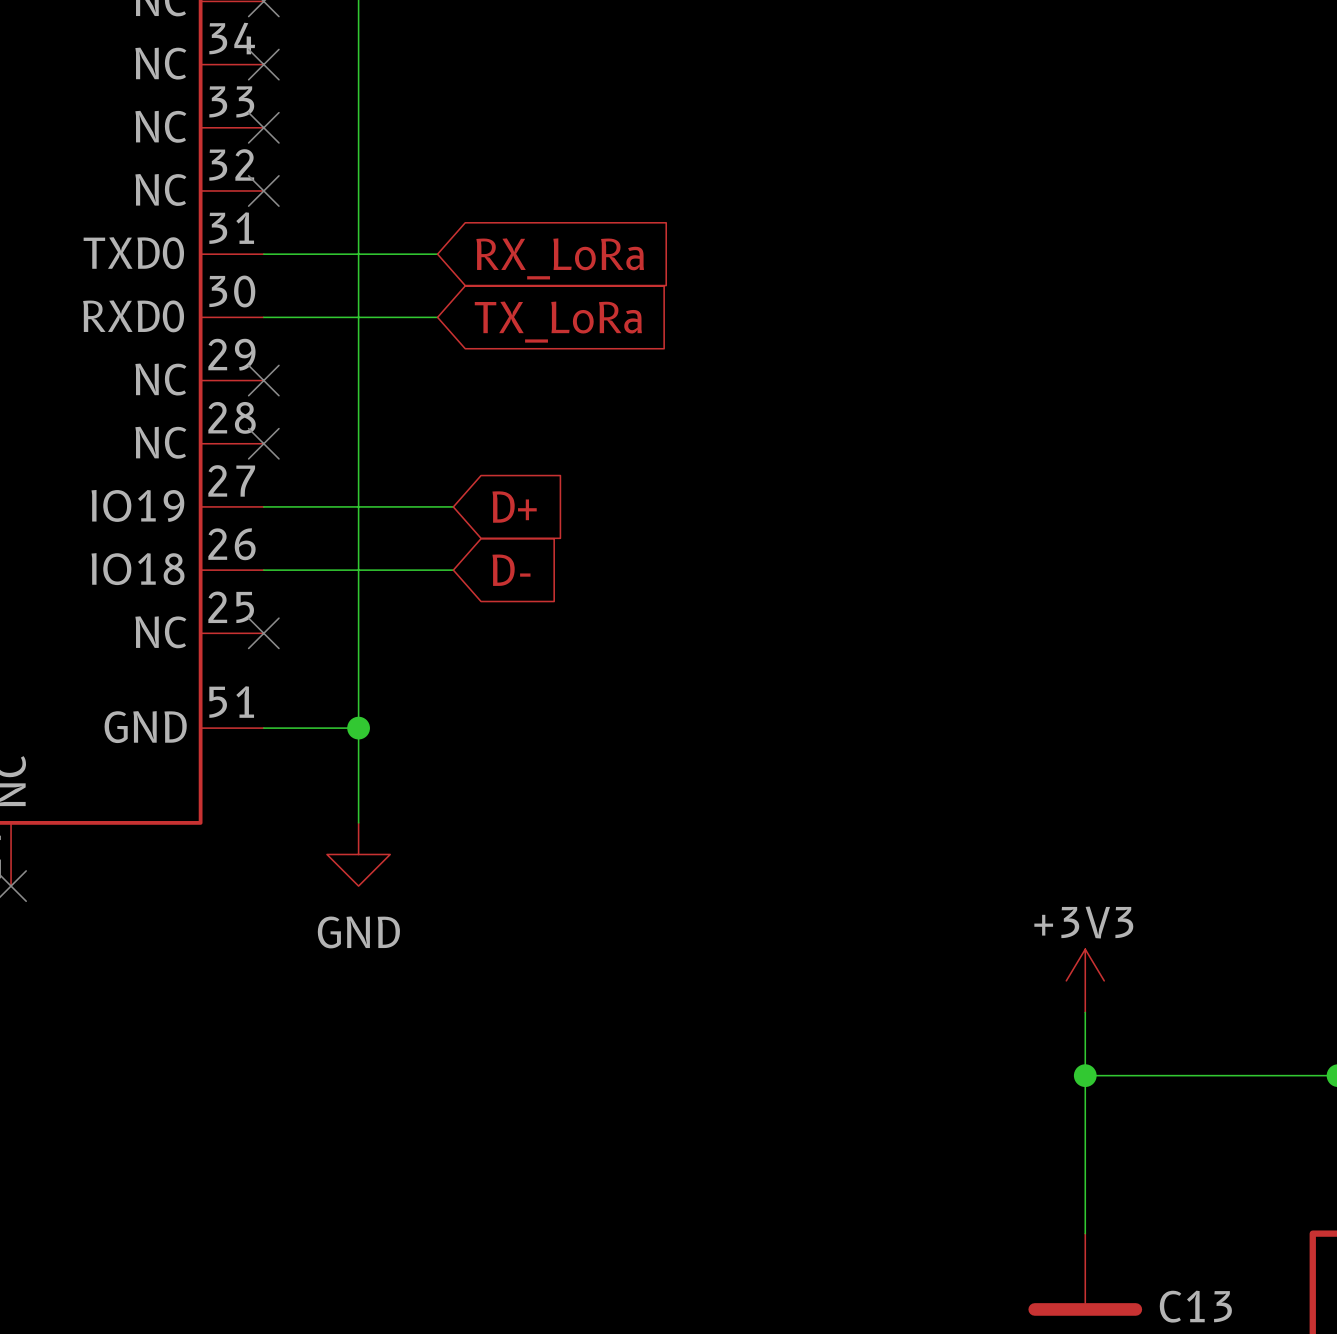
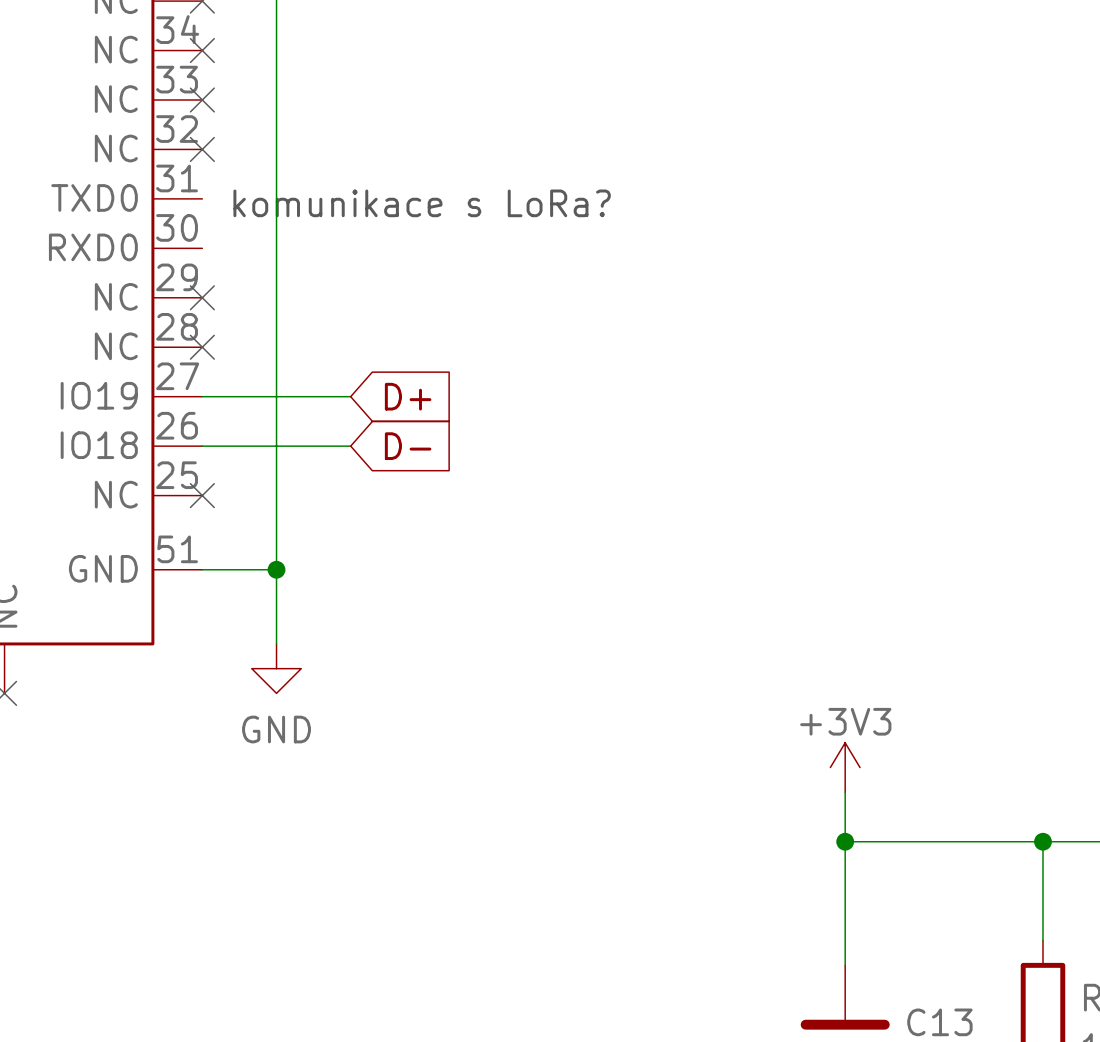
wire: (263, 254) (437, 254) -> none
global label: RX_LoRa (560, 258) -> none
text: none -> komunikace s LoRa? (422, 203)
wire: (263, 317) (437, 317) -> none
global label: TX_LoRa (558, 322) -> none

